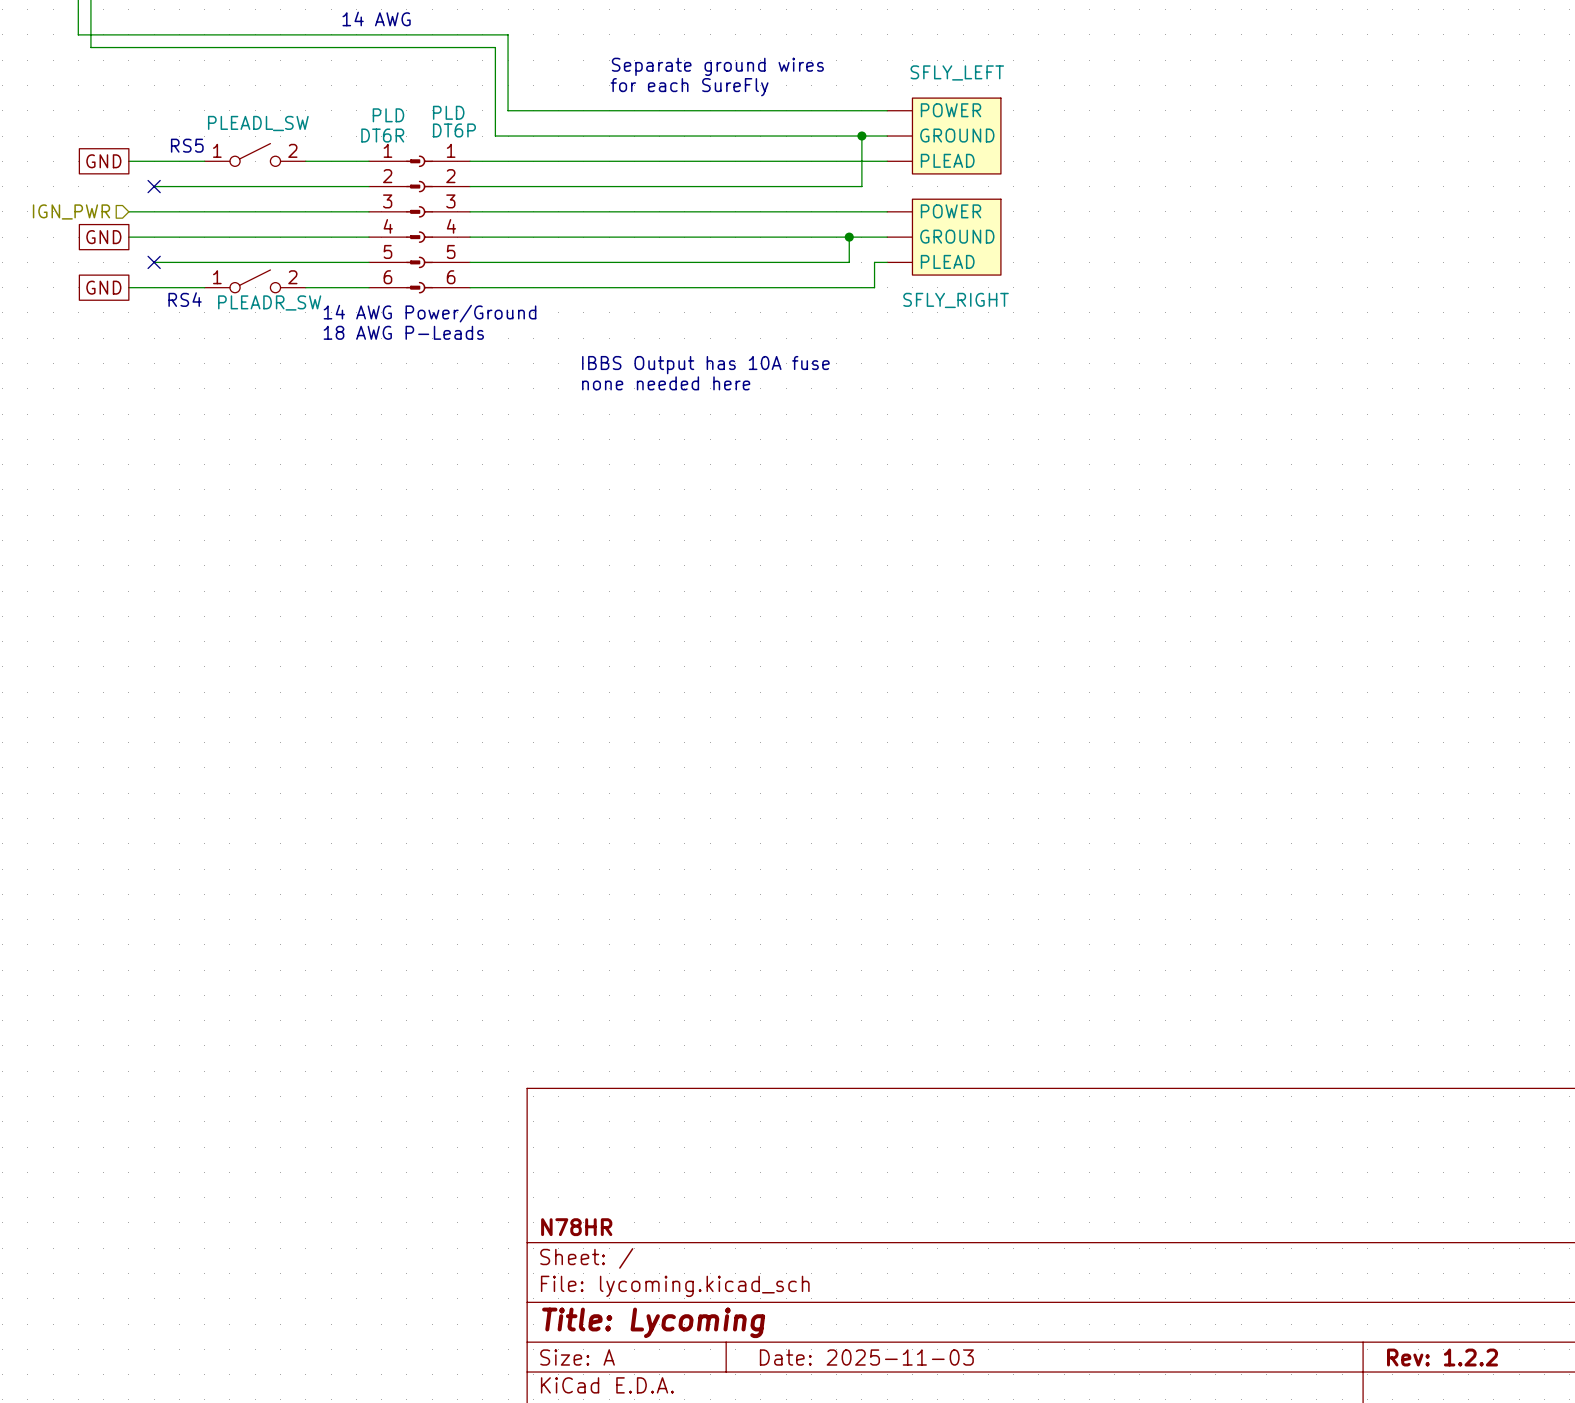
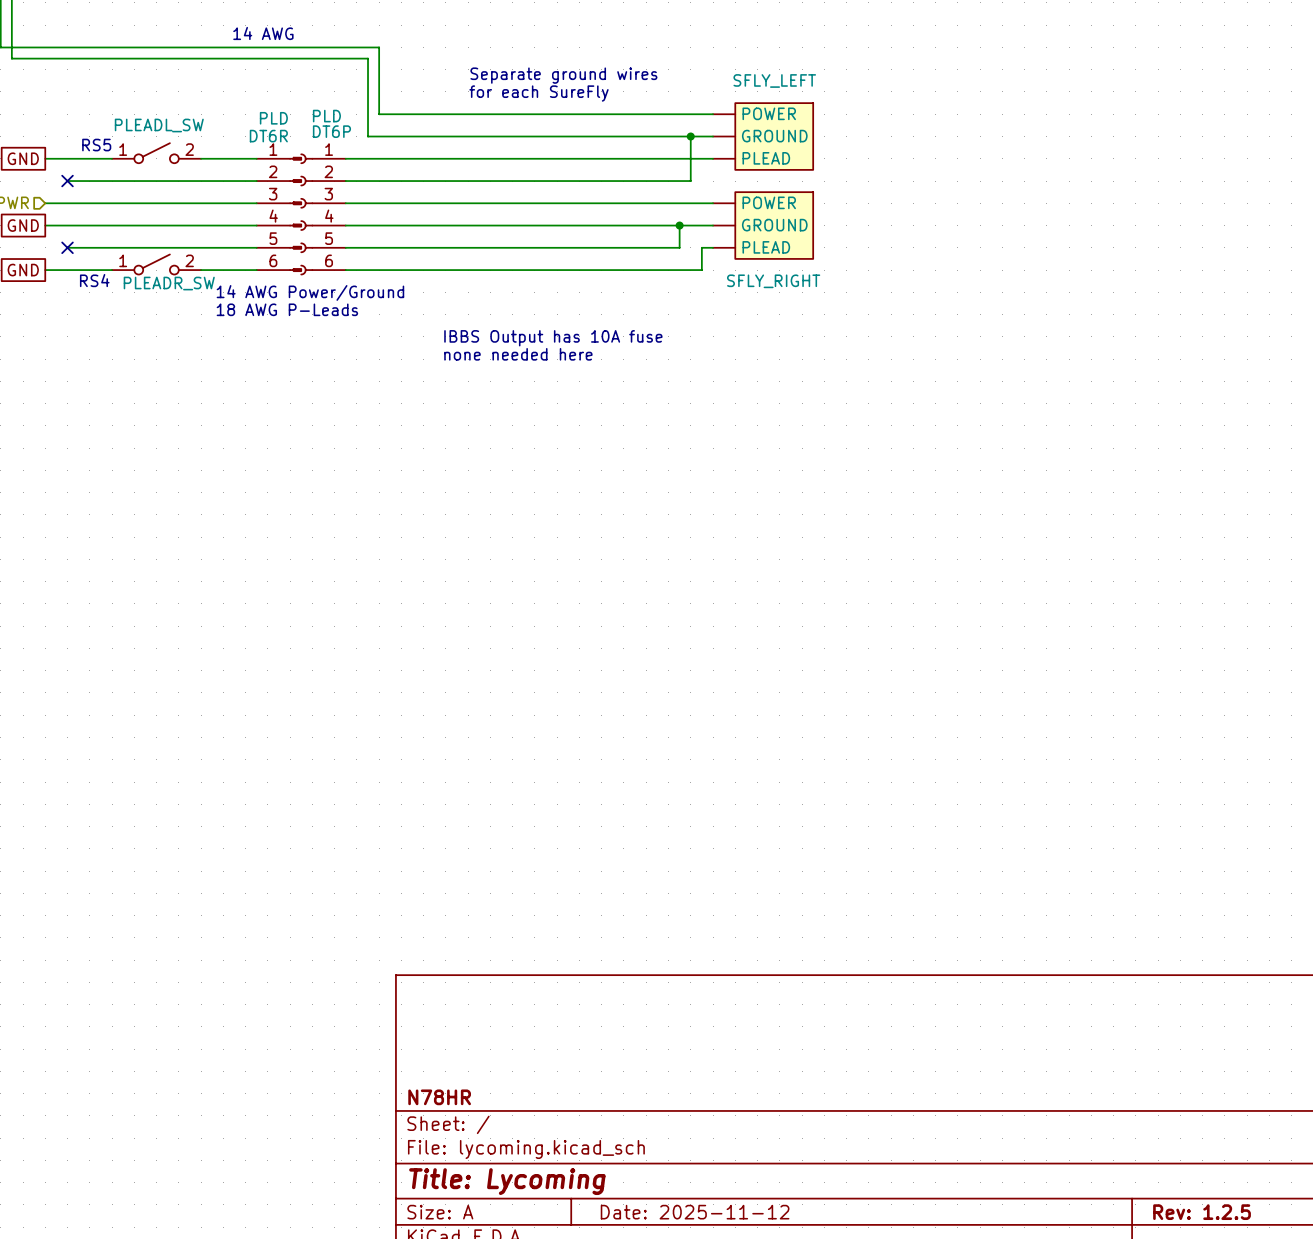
title block: Date: 2025-11-03 (866, 1357) -> Date: 2025-11-12 (695, 1212)
title block: Rev: 1.2.2 (1442, 1357) -> Rev: 1.2.5 (1202, 1212)

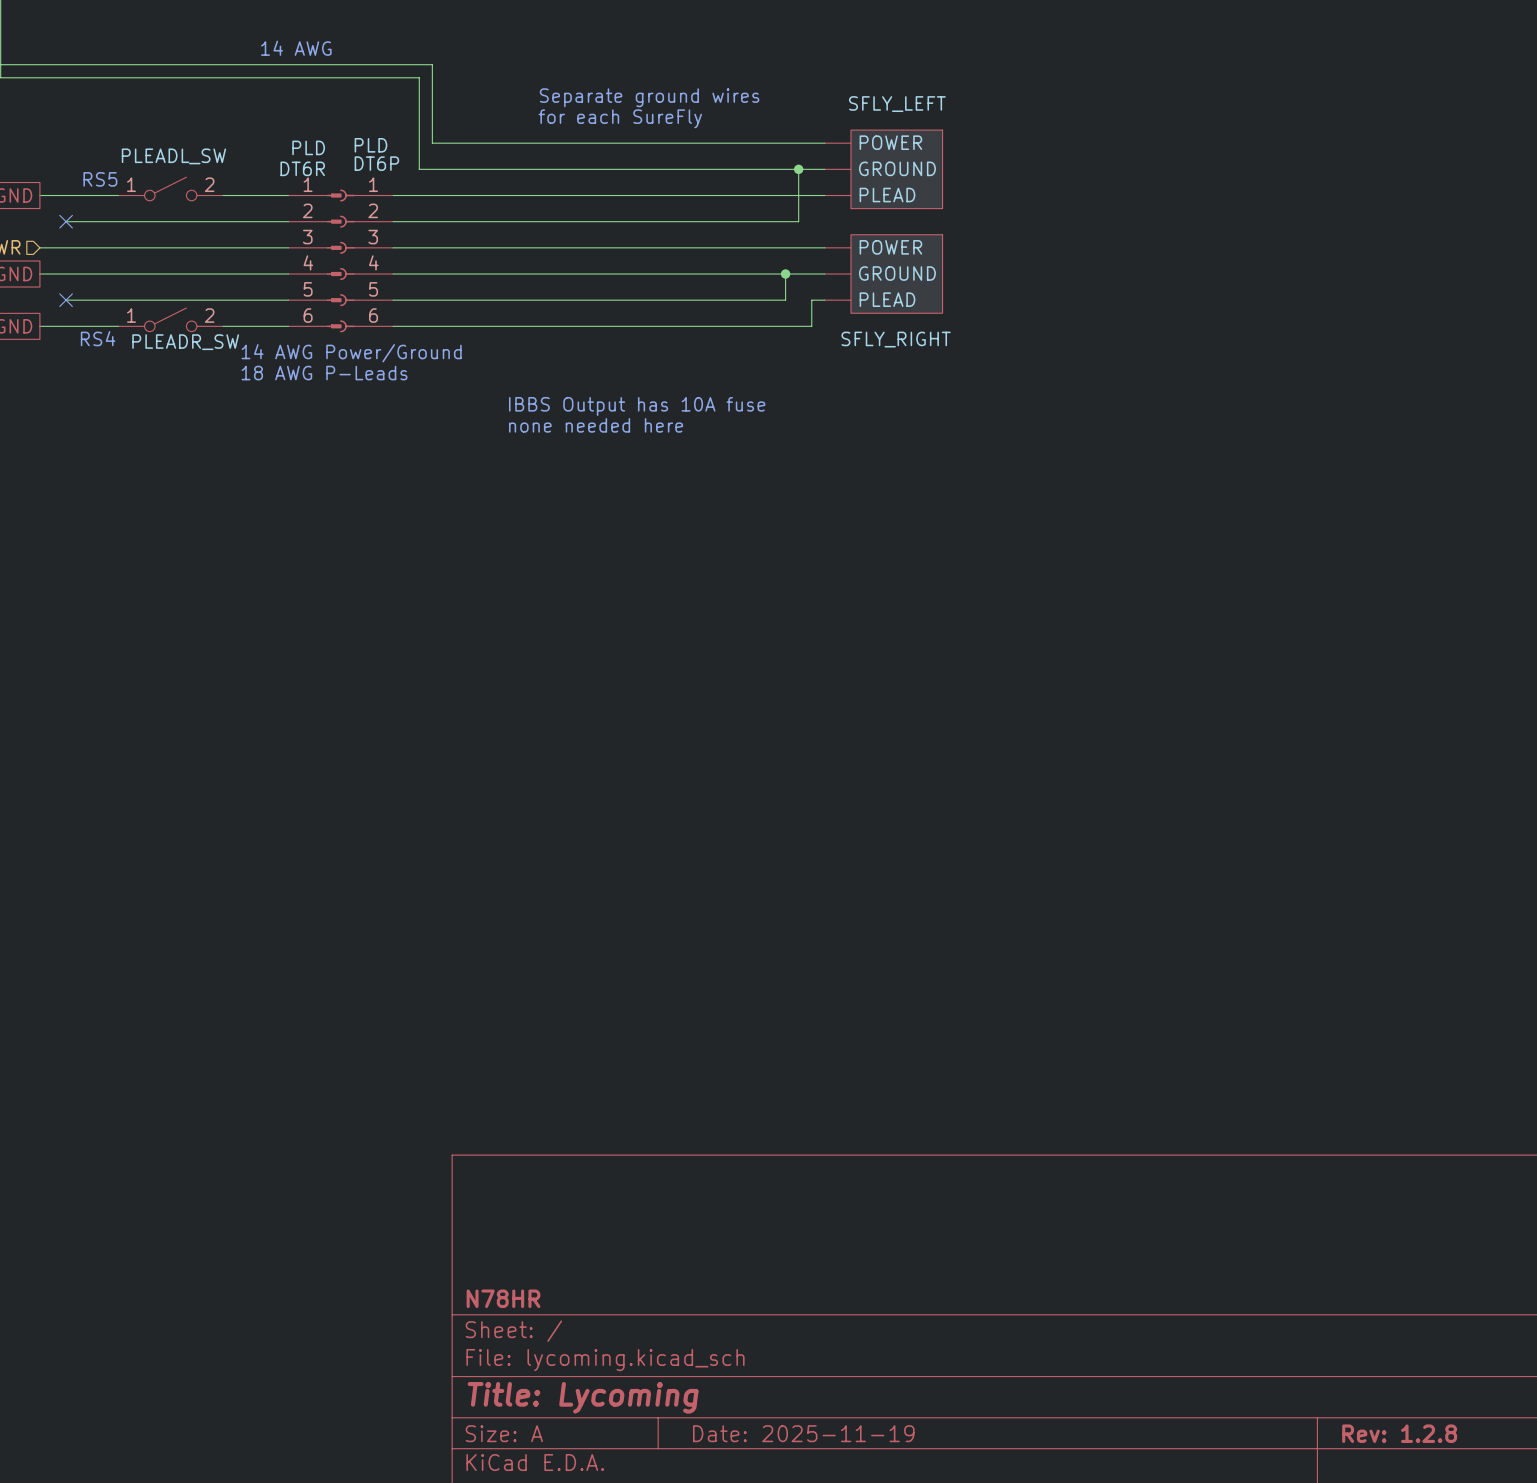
title block: Date: 2025-11-12 (695, 1212) -> Date: 2025-11-19 (803, 1433)
title block: Rev: 1.2.5 (1202, 1212) -> Rev: 1.2.8 (1399, 1433)

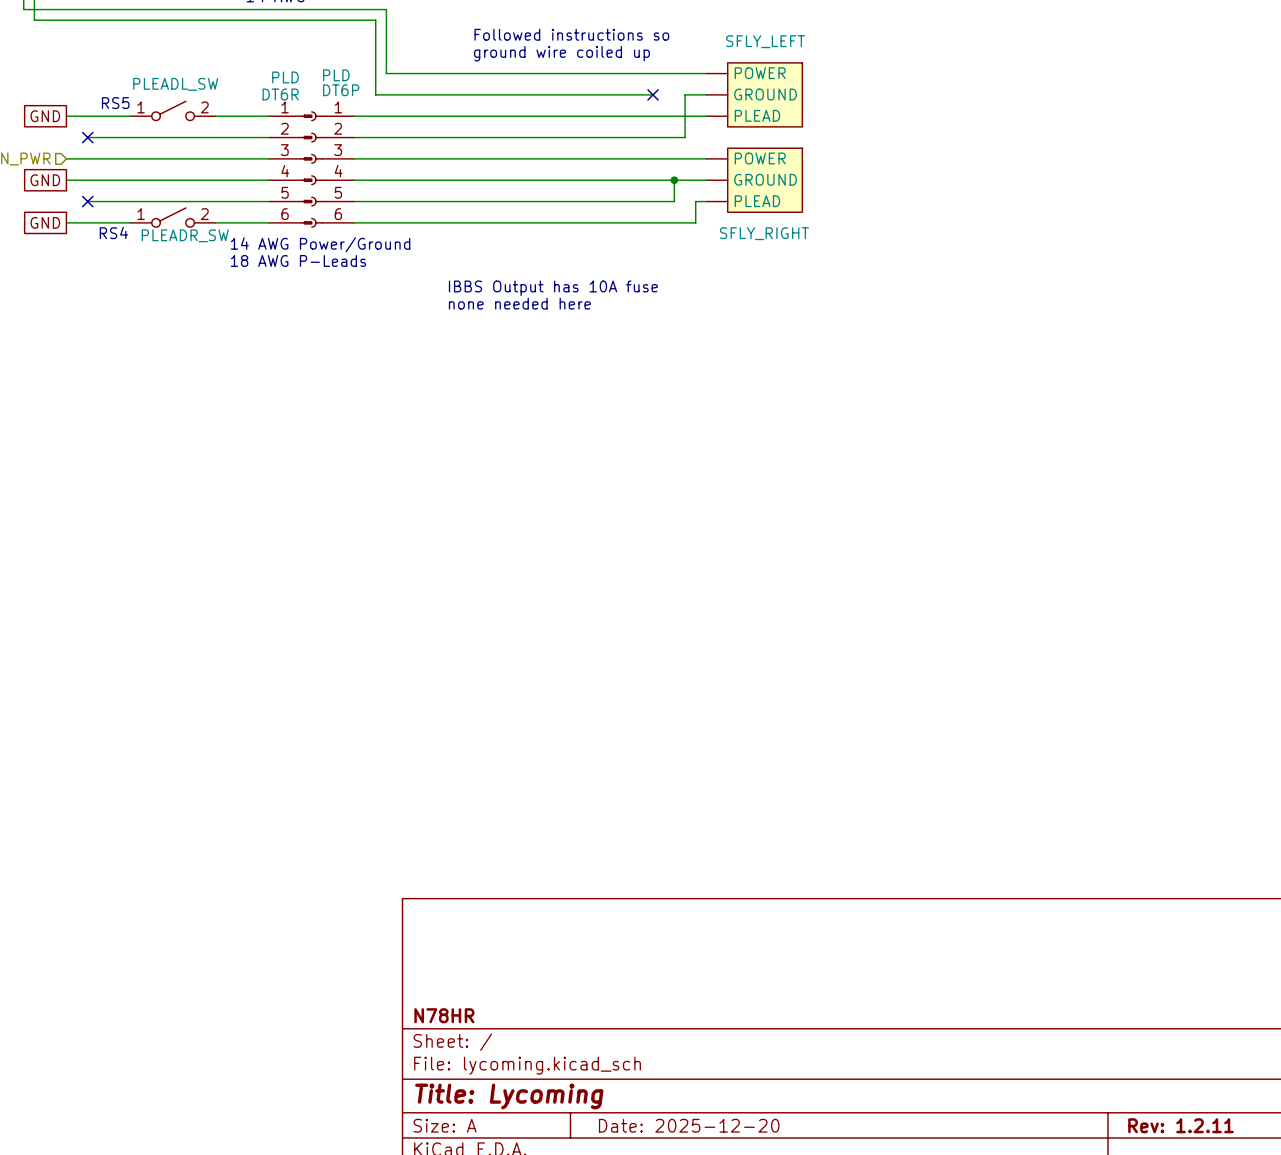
text: Separate ground wires (649, 97) -> Followed instructions so (571, 34)
text: for each SureFly (620, 118) -> ground wire coiled up (561, 53)
wire: (759, 169) (798, 169) -> none
no-connect mark: none -> (653, 94)
junction: (798, 169) -> none
title block: Date: 2025-11-19 (803, 1433) -> Date: 2025-12-20 (689, 1125)
title block: Rev: 1.2.8 (1399, 1433) -> Rev: 1.2.11 (1181, 1125)

